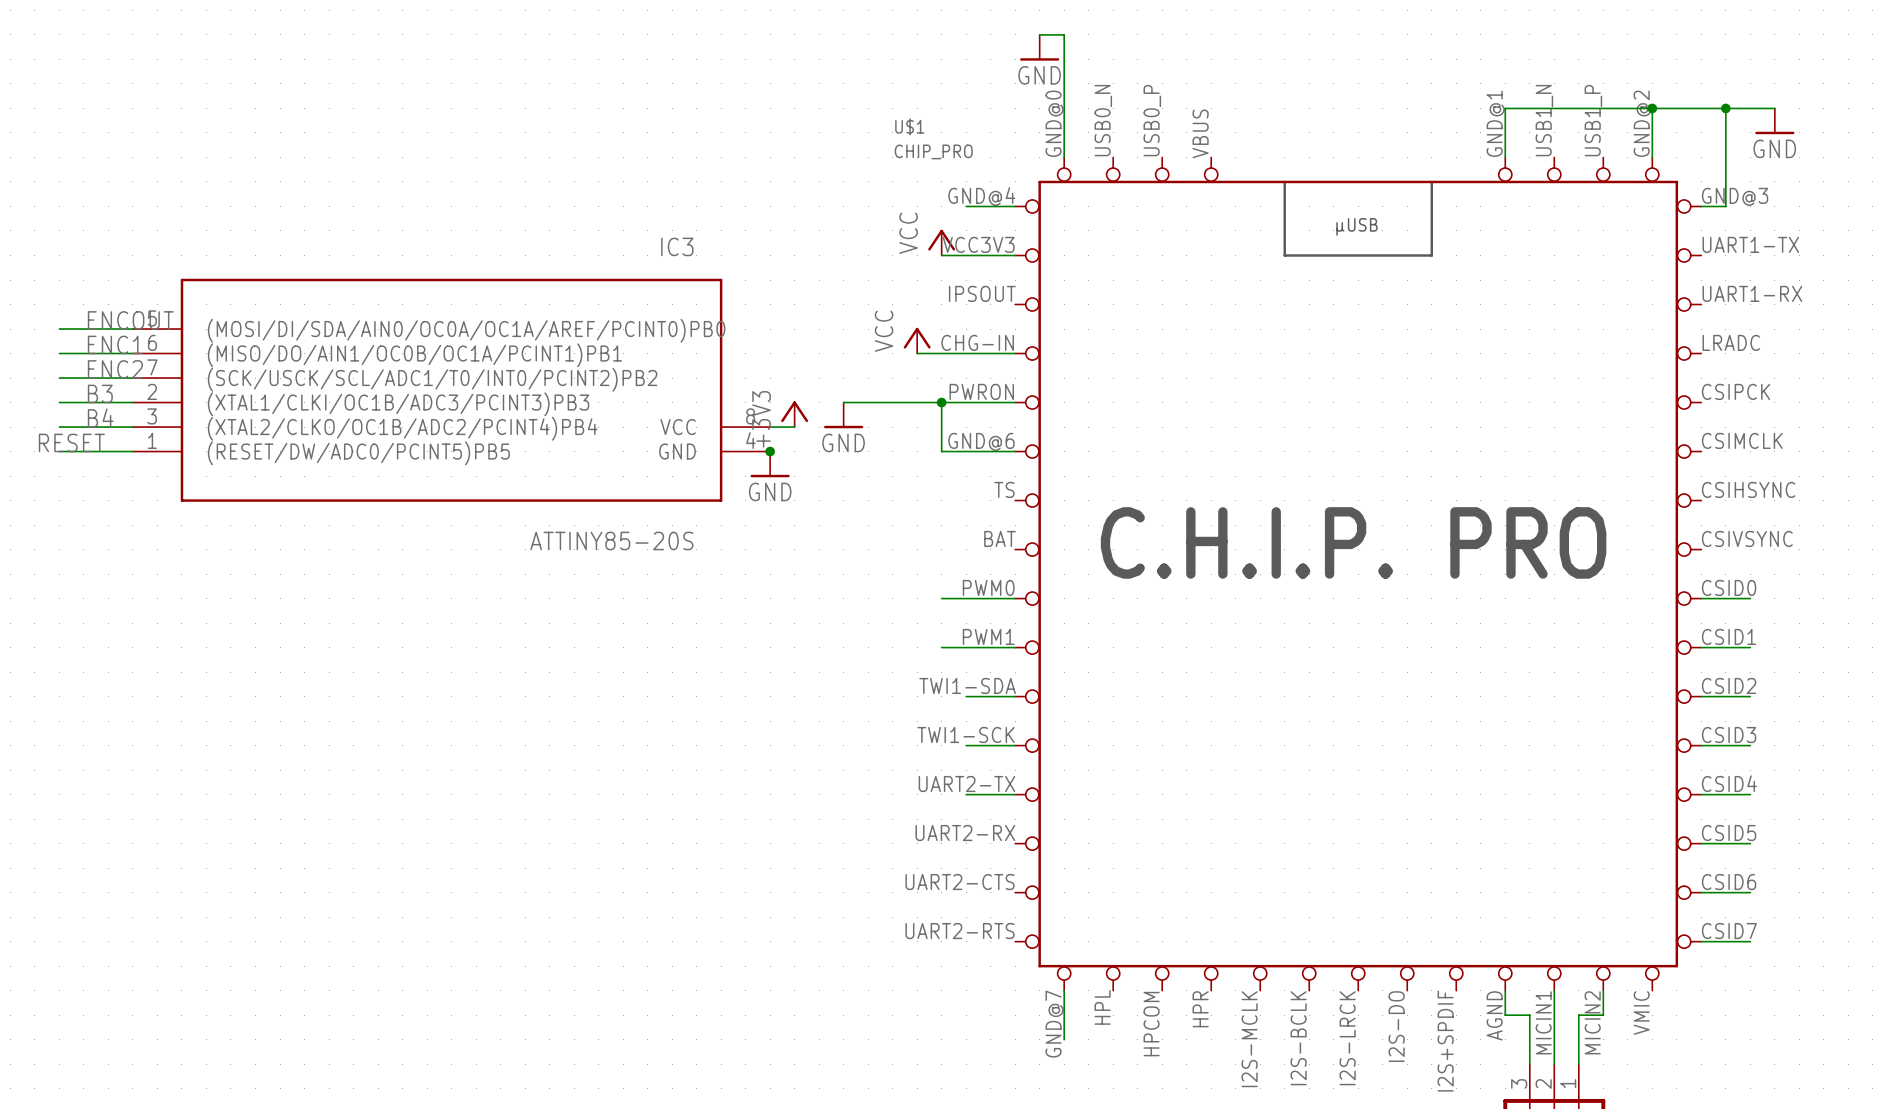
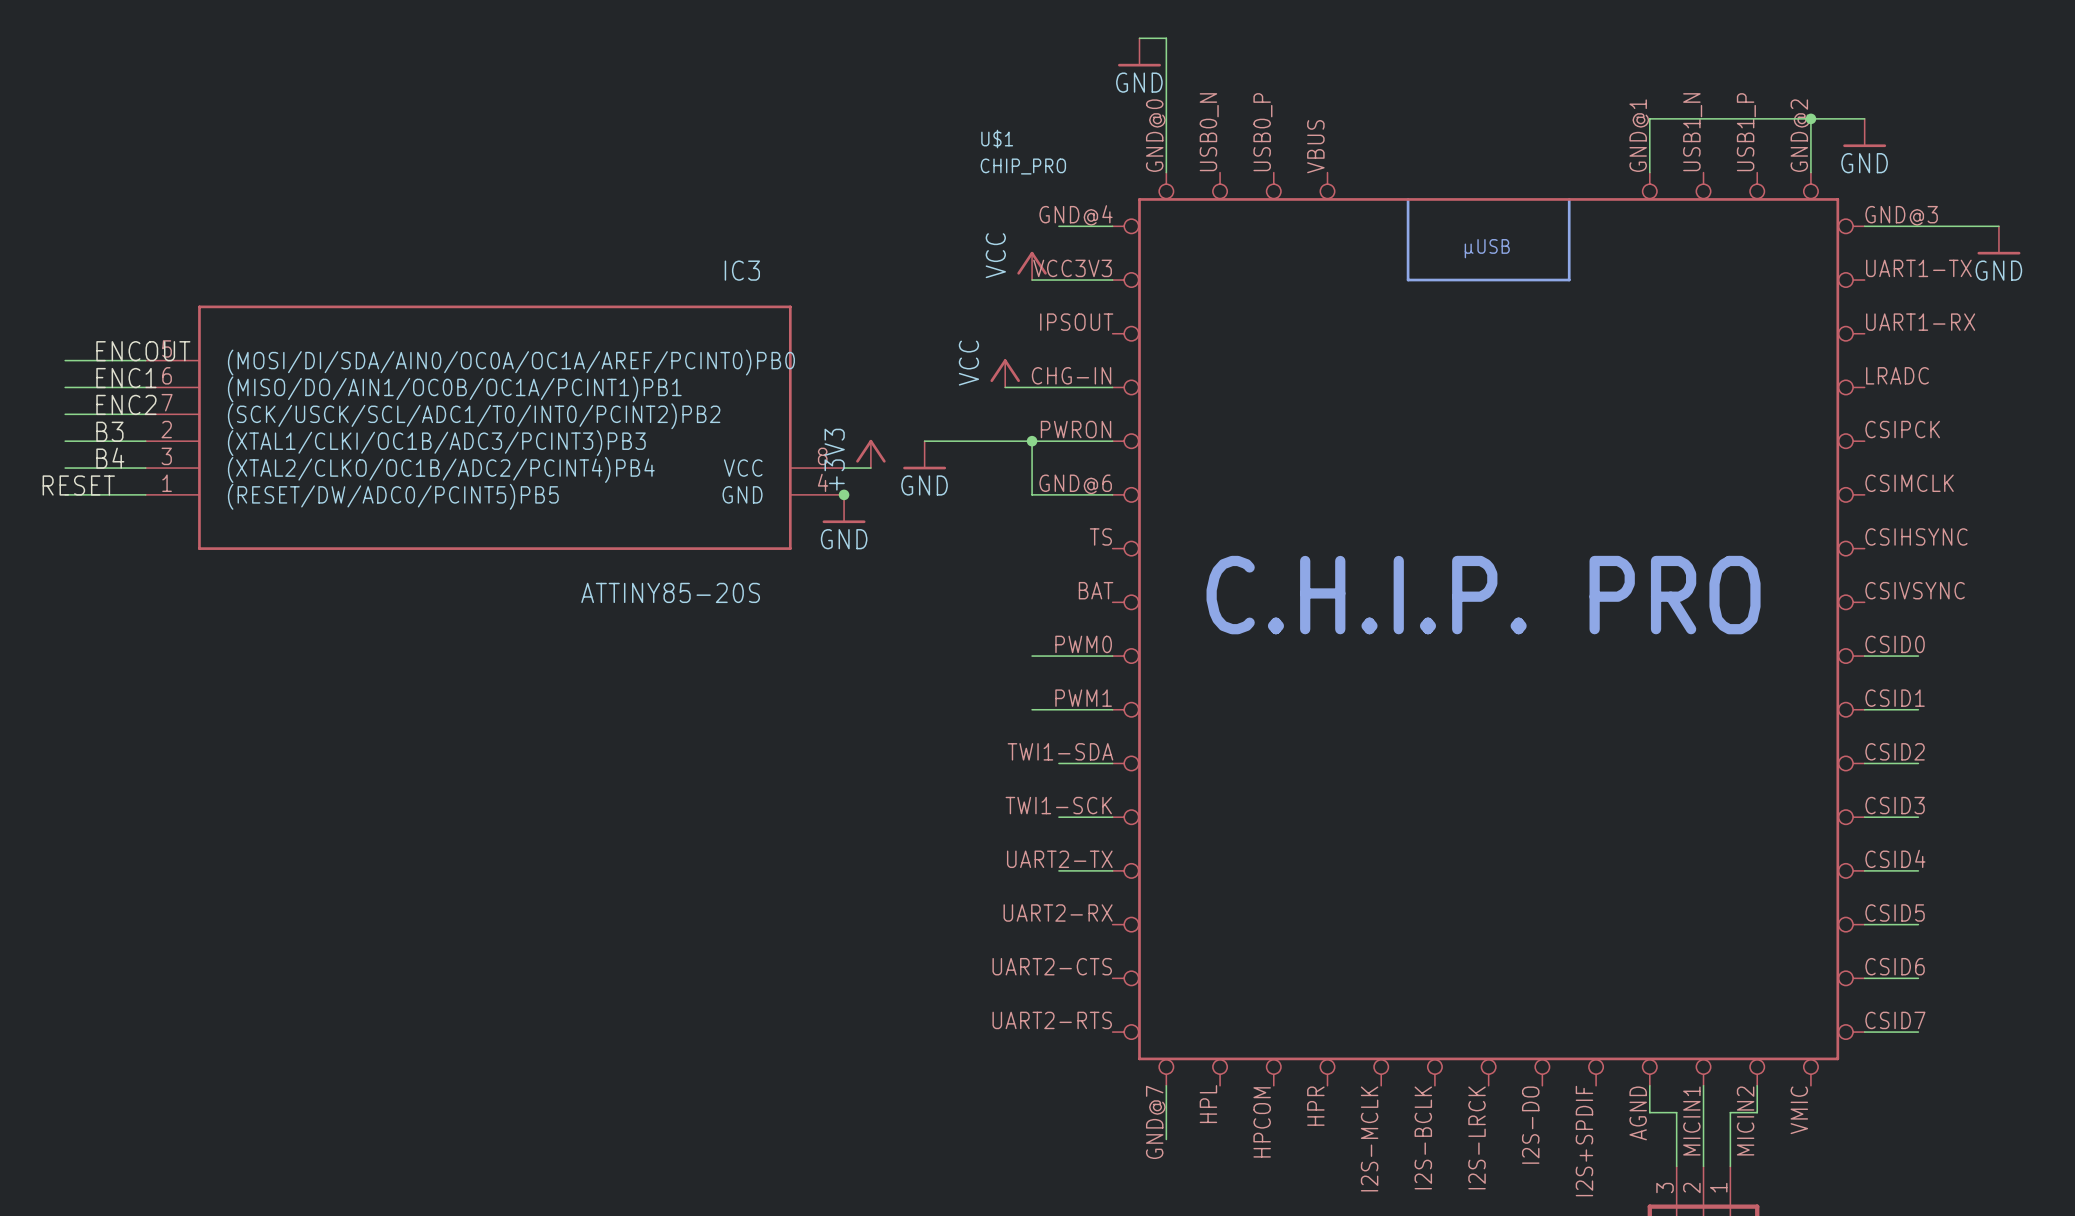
wire: (1701, 108) (1774, 108) -> none
wire: (1725, 108) (1725, 206) -> (1998, 226) (1891, 226)
junction: (1725, 108) -> none
power symbol: none -> GND (1864, 132)
power symbol: GND (1774, 121) -> none
power symbol: none -> GND (1998, 240)

